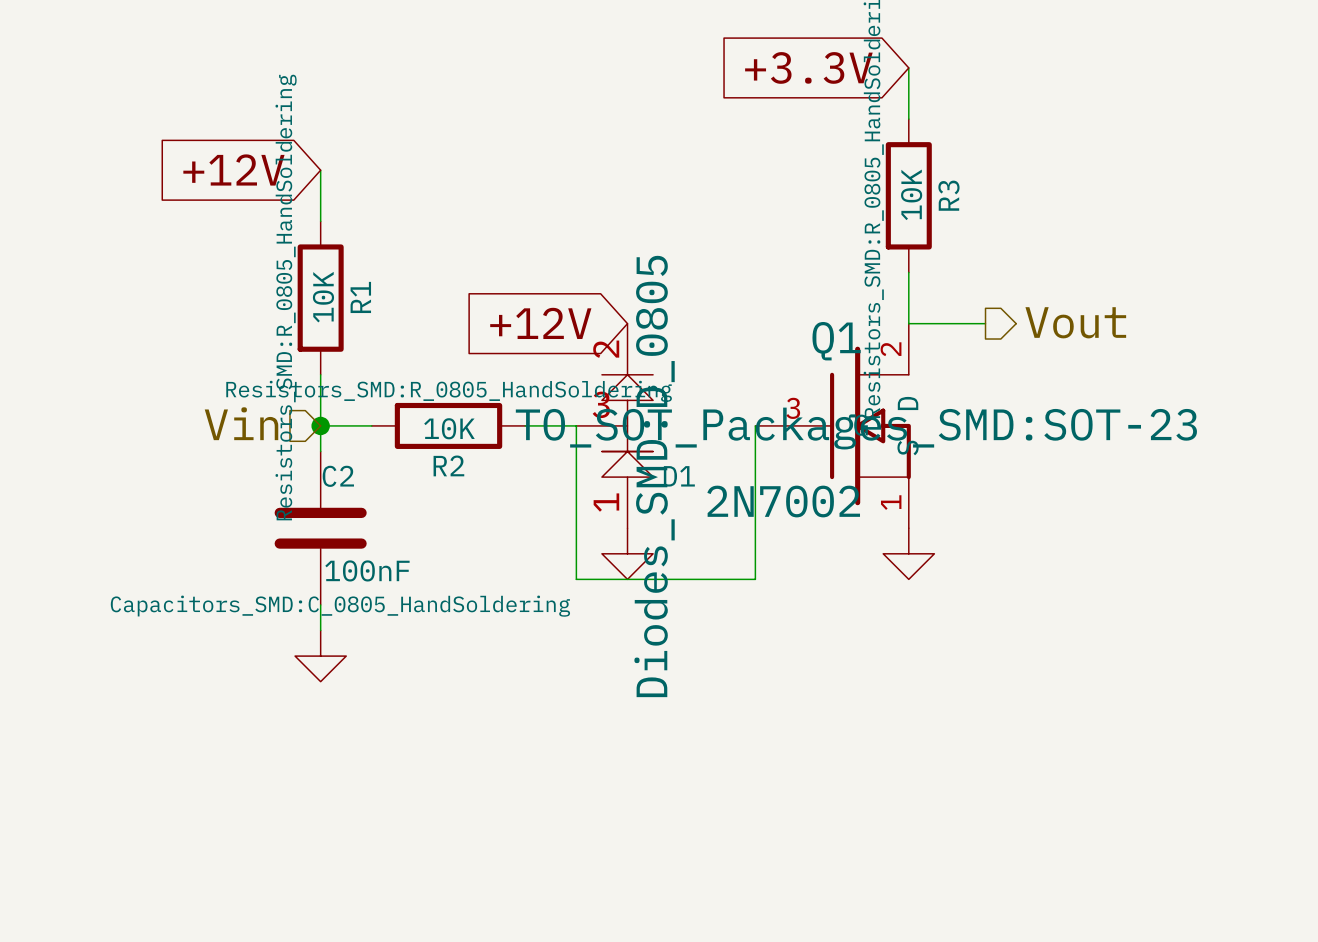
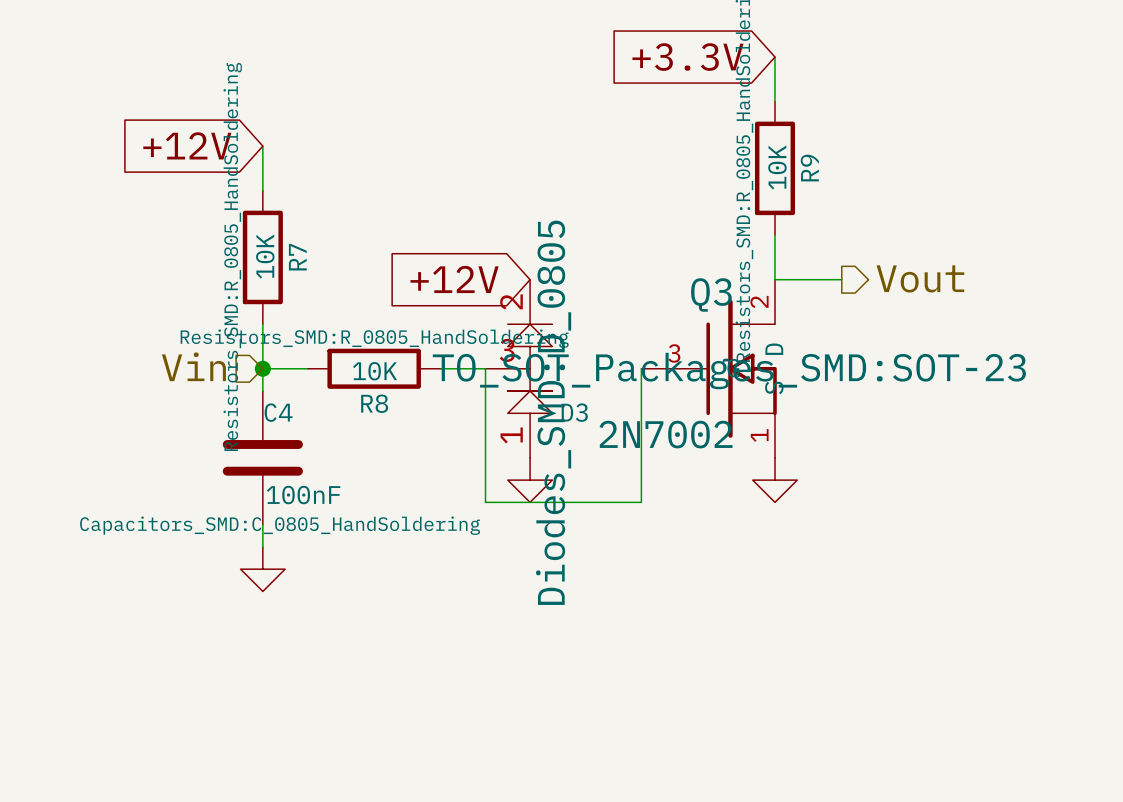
R3 name: R3 (948, 195) -> R9 (809, 168)
R1 name: R1 (360, 297) -> R7 (297, 257)
Q1 name: Q1 (836, 341) -> Q3 (711, 294)
R2 name: R2 (448, 465) -> R8 (374, 403)
C2 name: C2 (338, 476) -> C4 (278, 412)
D1 name: D1 (679, 476) -> D3 (574, 412)

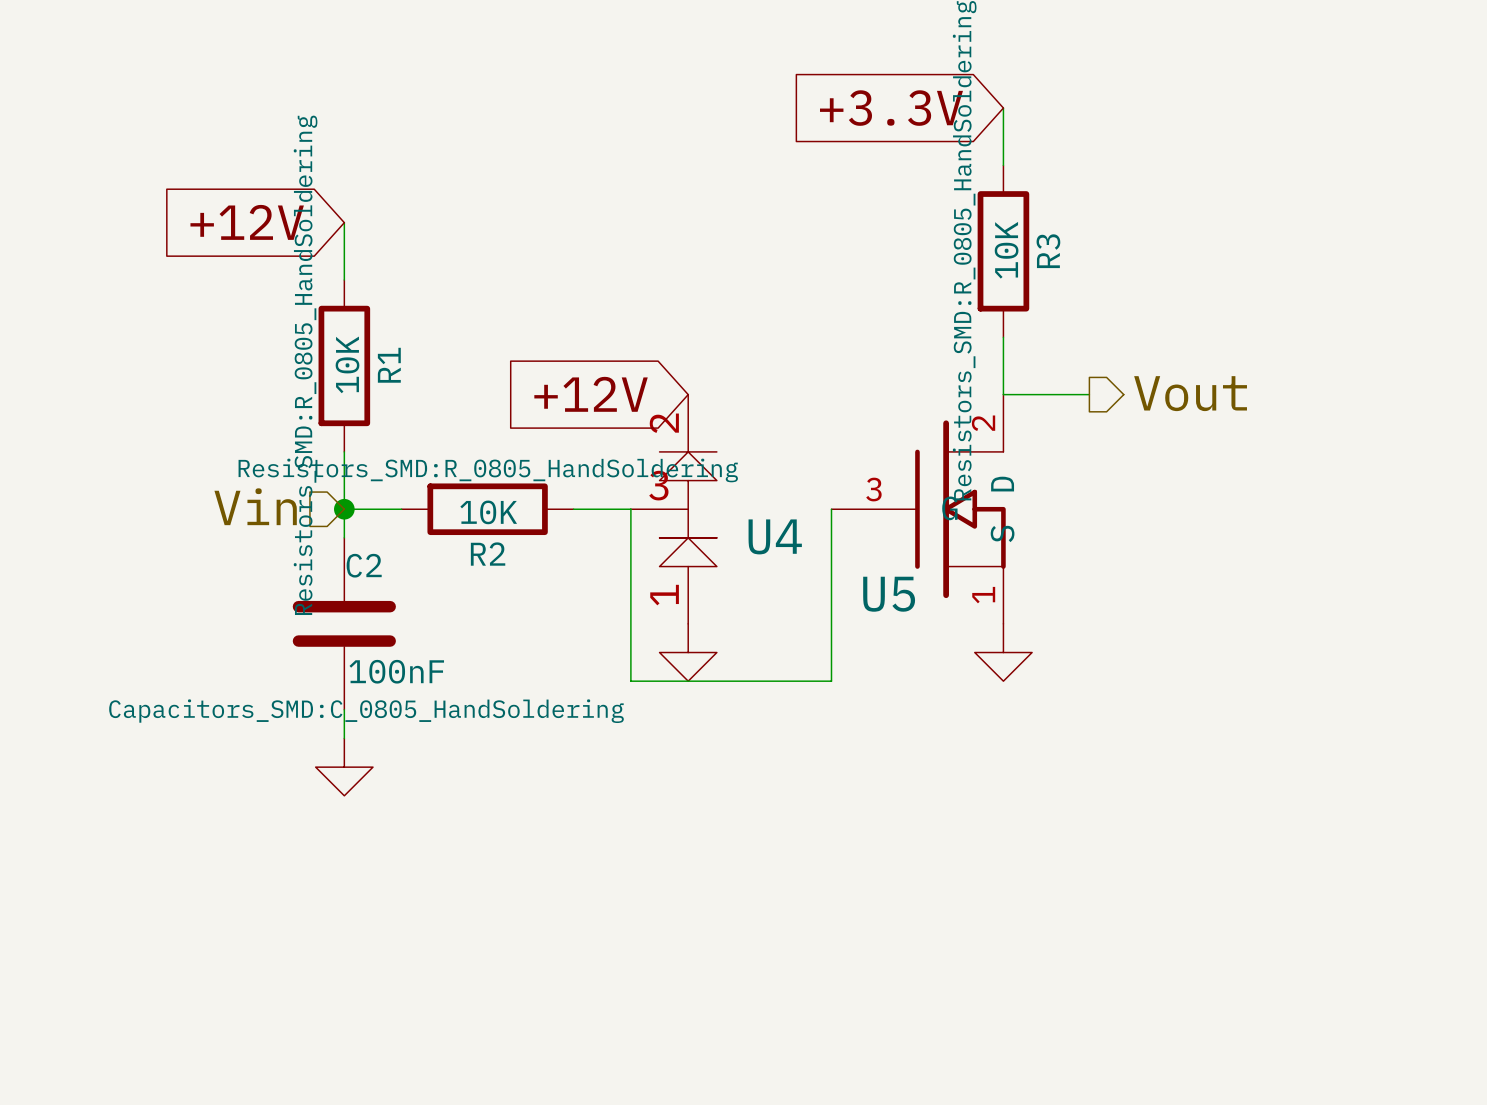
R9 name: R9 (809, 168) -> R3 (1048, 251)
R7 name: R7 (297, 257) -> R1 (389, 365)
Q3 name: Q3 (711, 294) -> U5 (889, 594)
Q3 text: TO_SOT_Packages_SMD:SOT-23 (729, 371) -> none
R8 name: R8 (374, 403) -> R2 (488, 554)
C4 name: C4 (278, 412) -> C2 (364, 565)
D3 text: Diodes_SMD:D_0805 (553, 412) -> none
D3 name: D3 (574, 412) -> U4 (775, 536)
Q3 value: 2N7002 (666, 434) -> none

